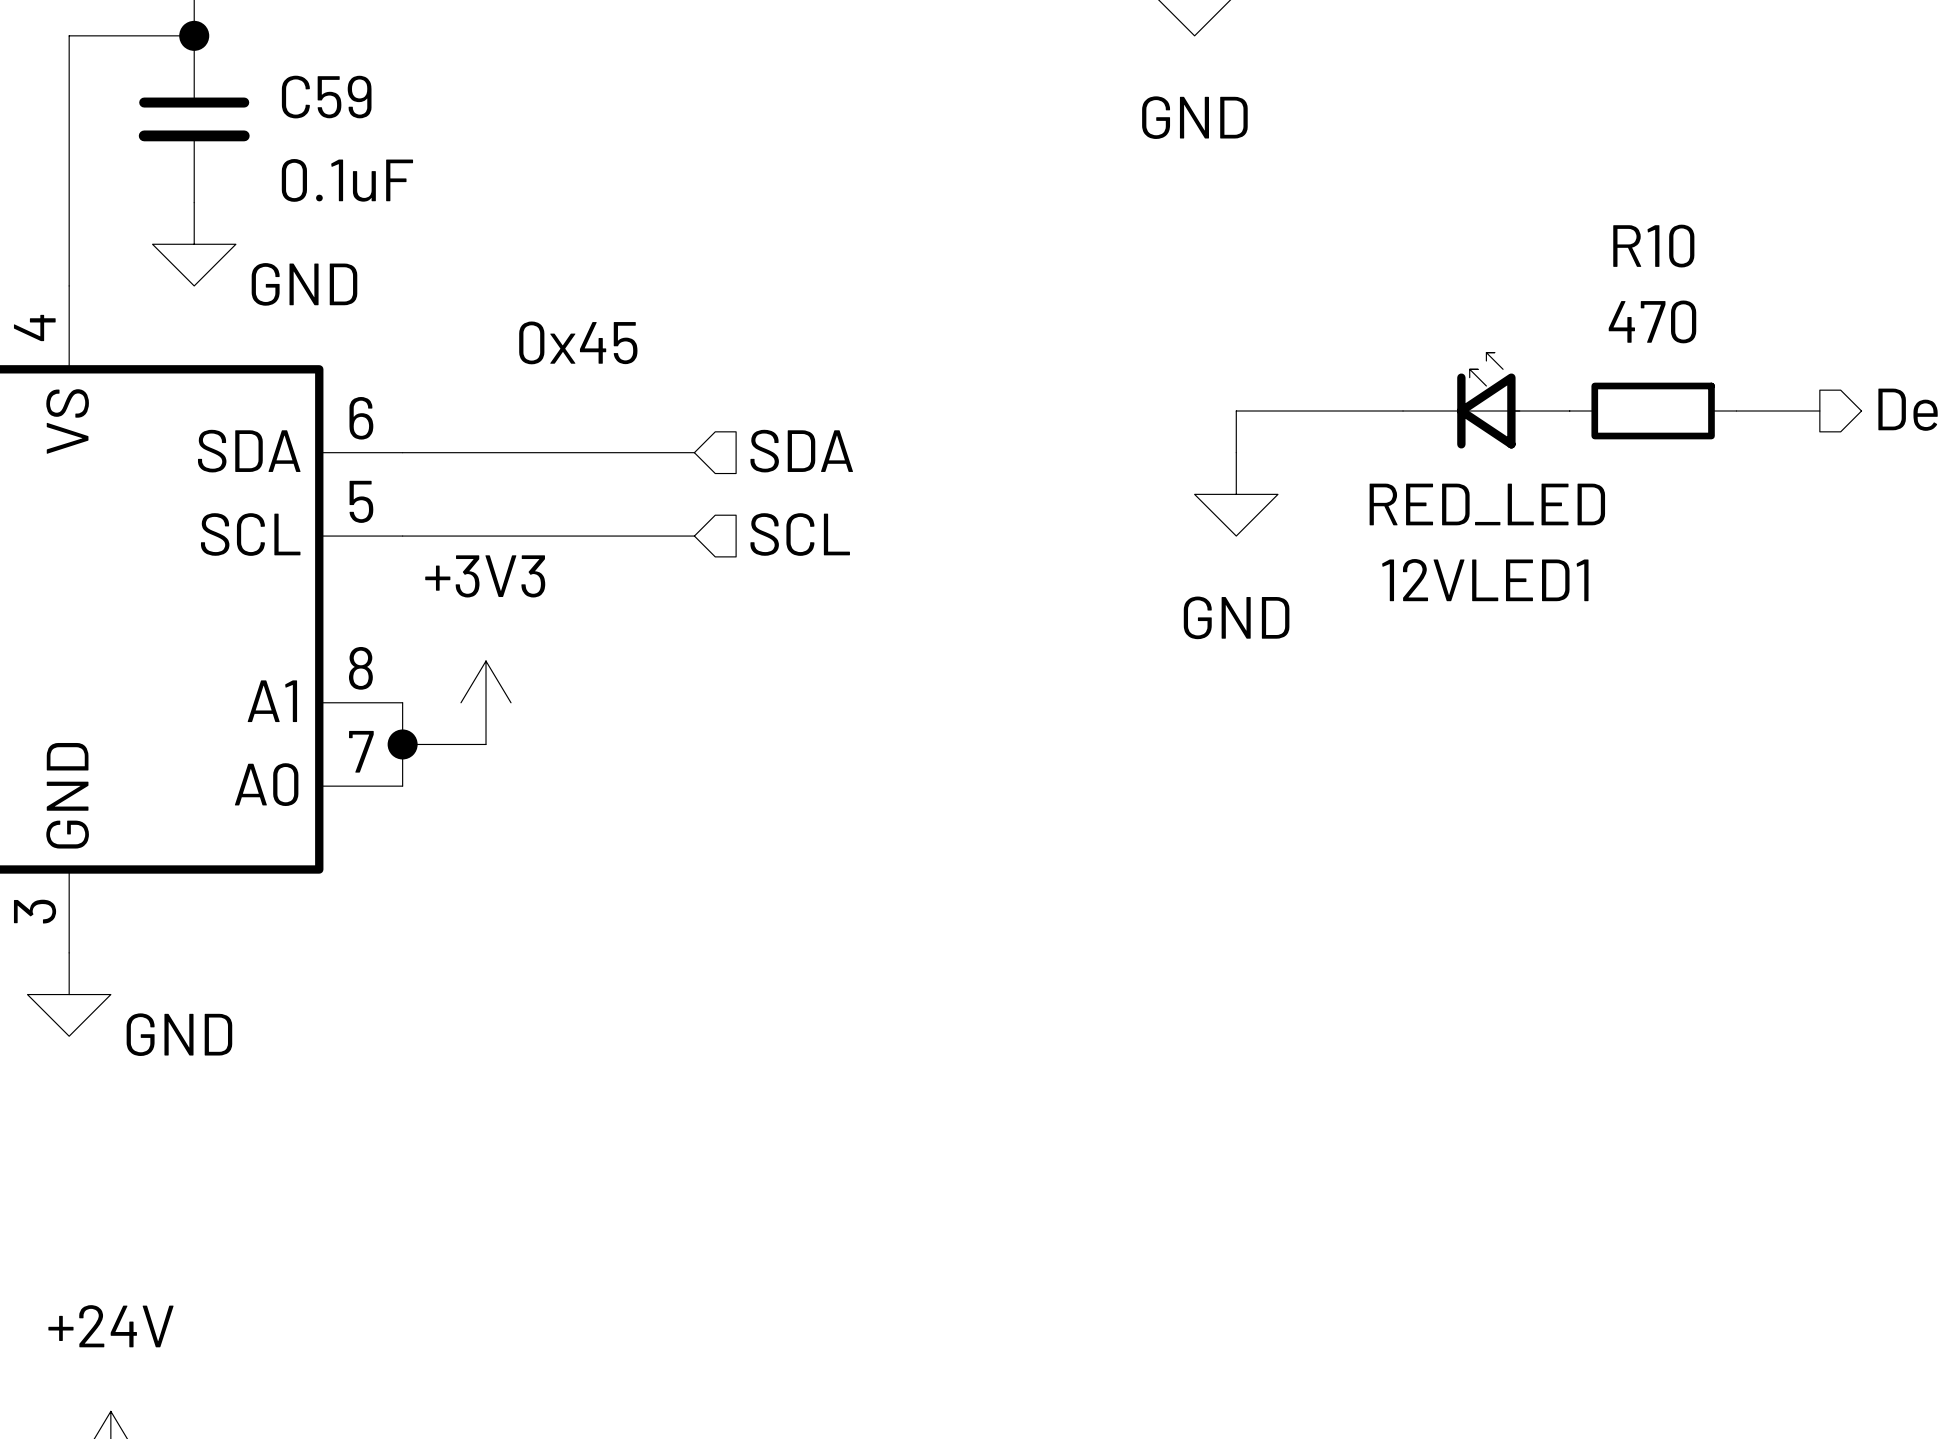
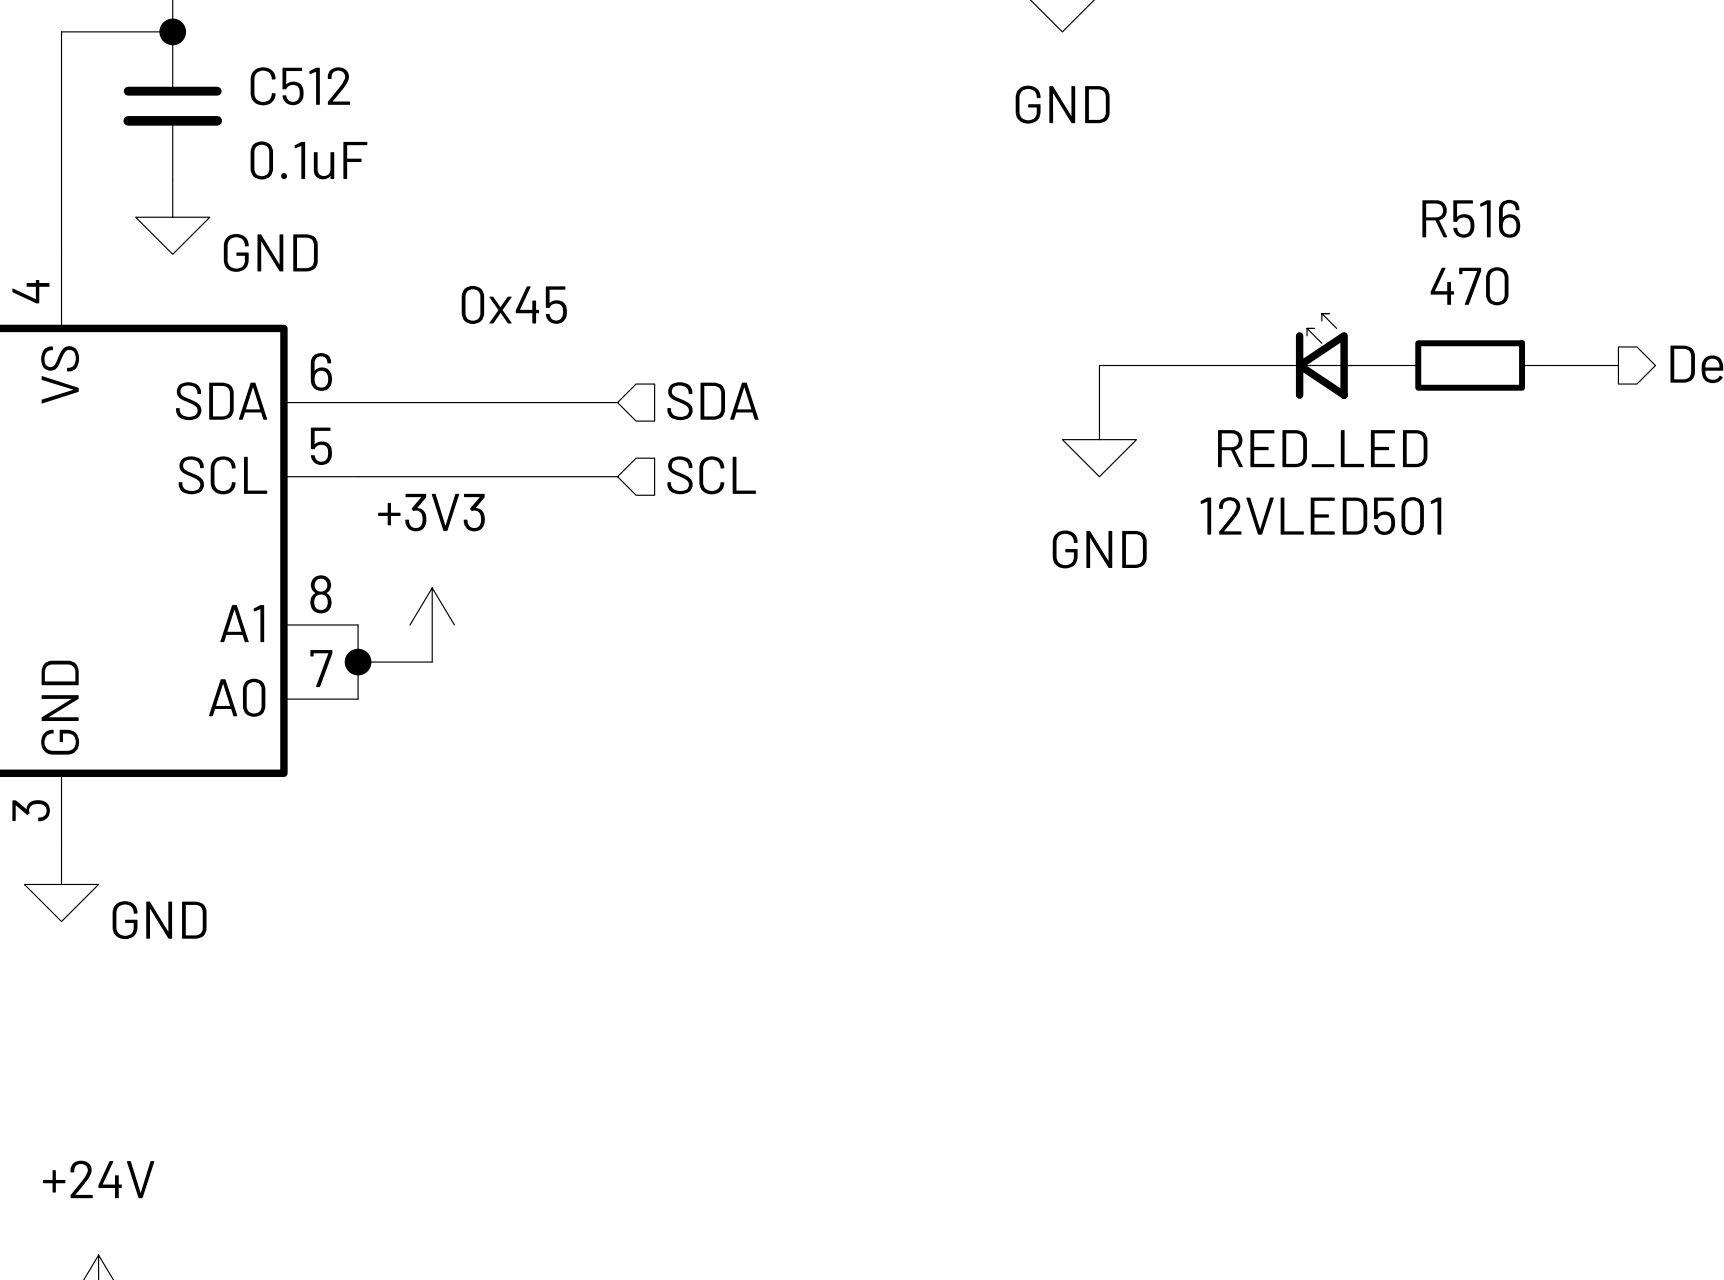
C59 name: C59 (326, 97) -> C512 (300, 86)
R10 name: R10 (1653, 246) -> R516 (1471, 218)
12VLED1 name: 12VLED1 (1485, 580) -> 12VLED501 (1320, 516)

